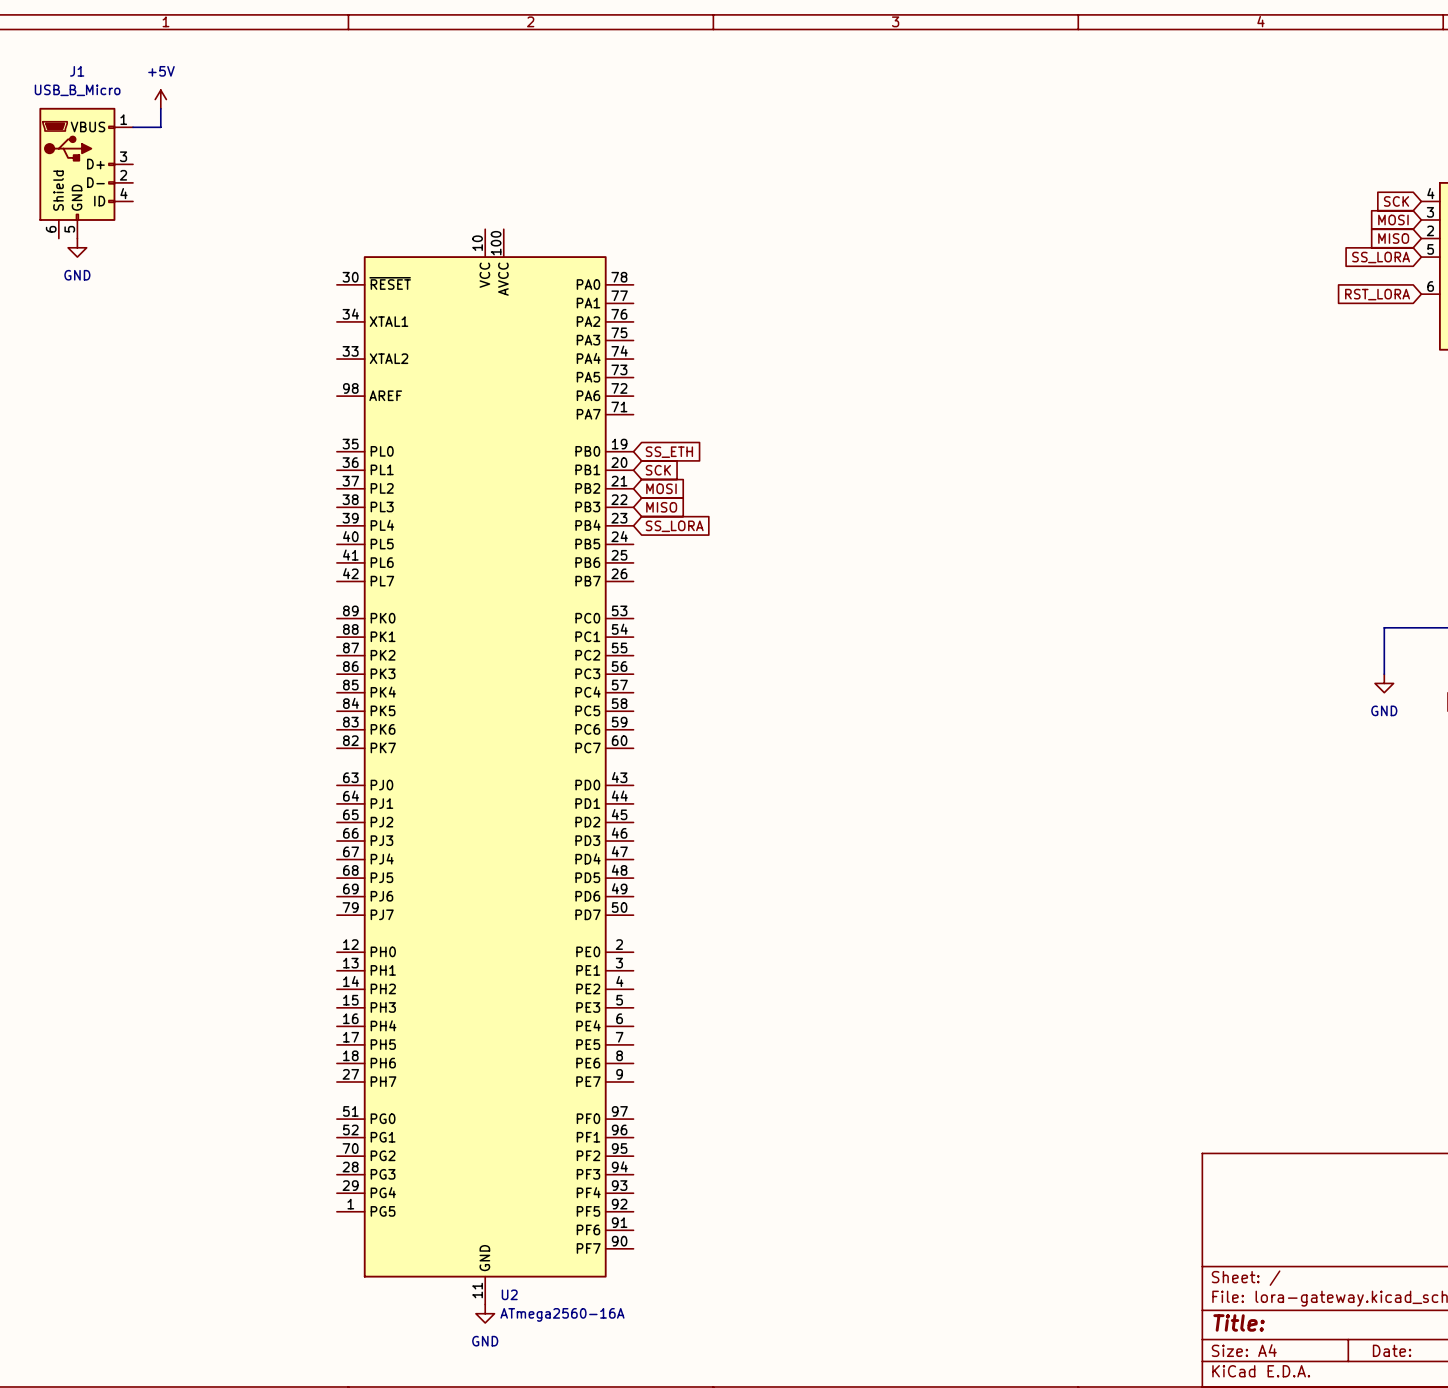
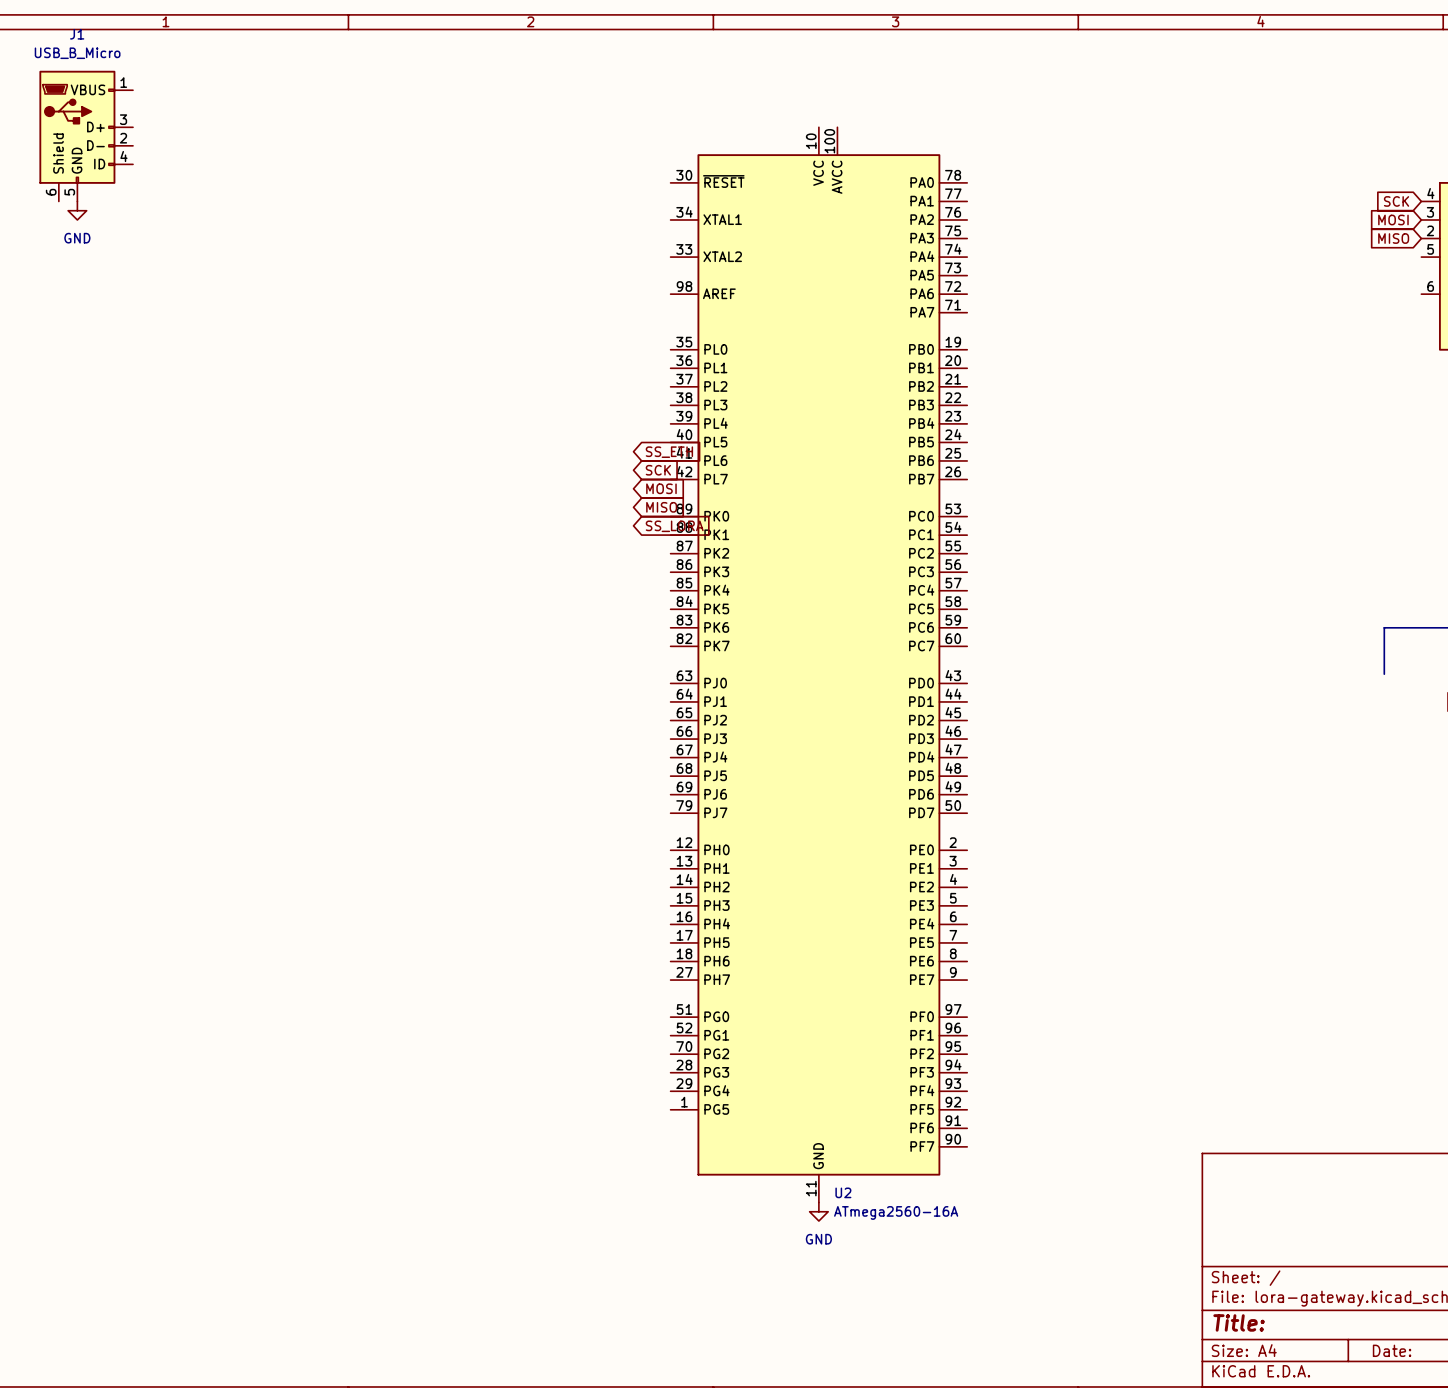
power symbol: +5V (160, 99) -> none
wire: (160, 108) (160, 127) (133, 127) -> none
J1 position: (86, 173) -> (86, 136)
power symbol position: GND (77, 247) -> GND (77, 210)
global label: SS_LORA (1381, 257) -> none
global label: RST_LORA (1377, 294) -> none
power symbol: GND (1384, 683) -> none
U2 position: (485, 766) -> (818, 664)
power symbol: none -> GND (818, 1211)
power symbol: GND (485, 1313) -> none

